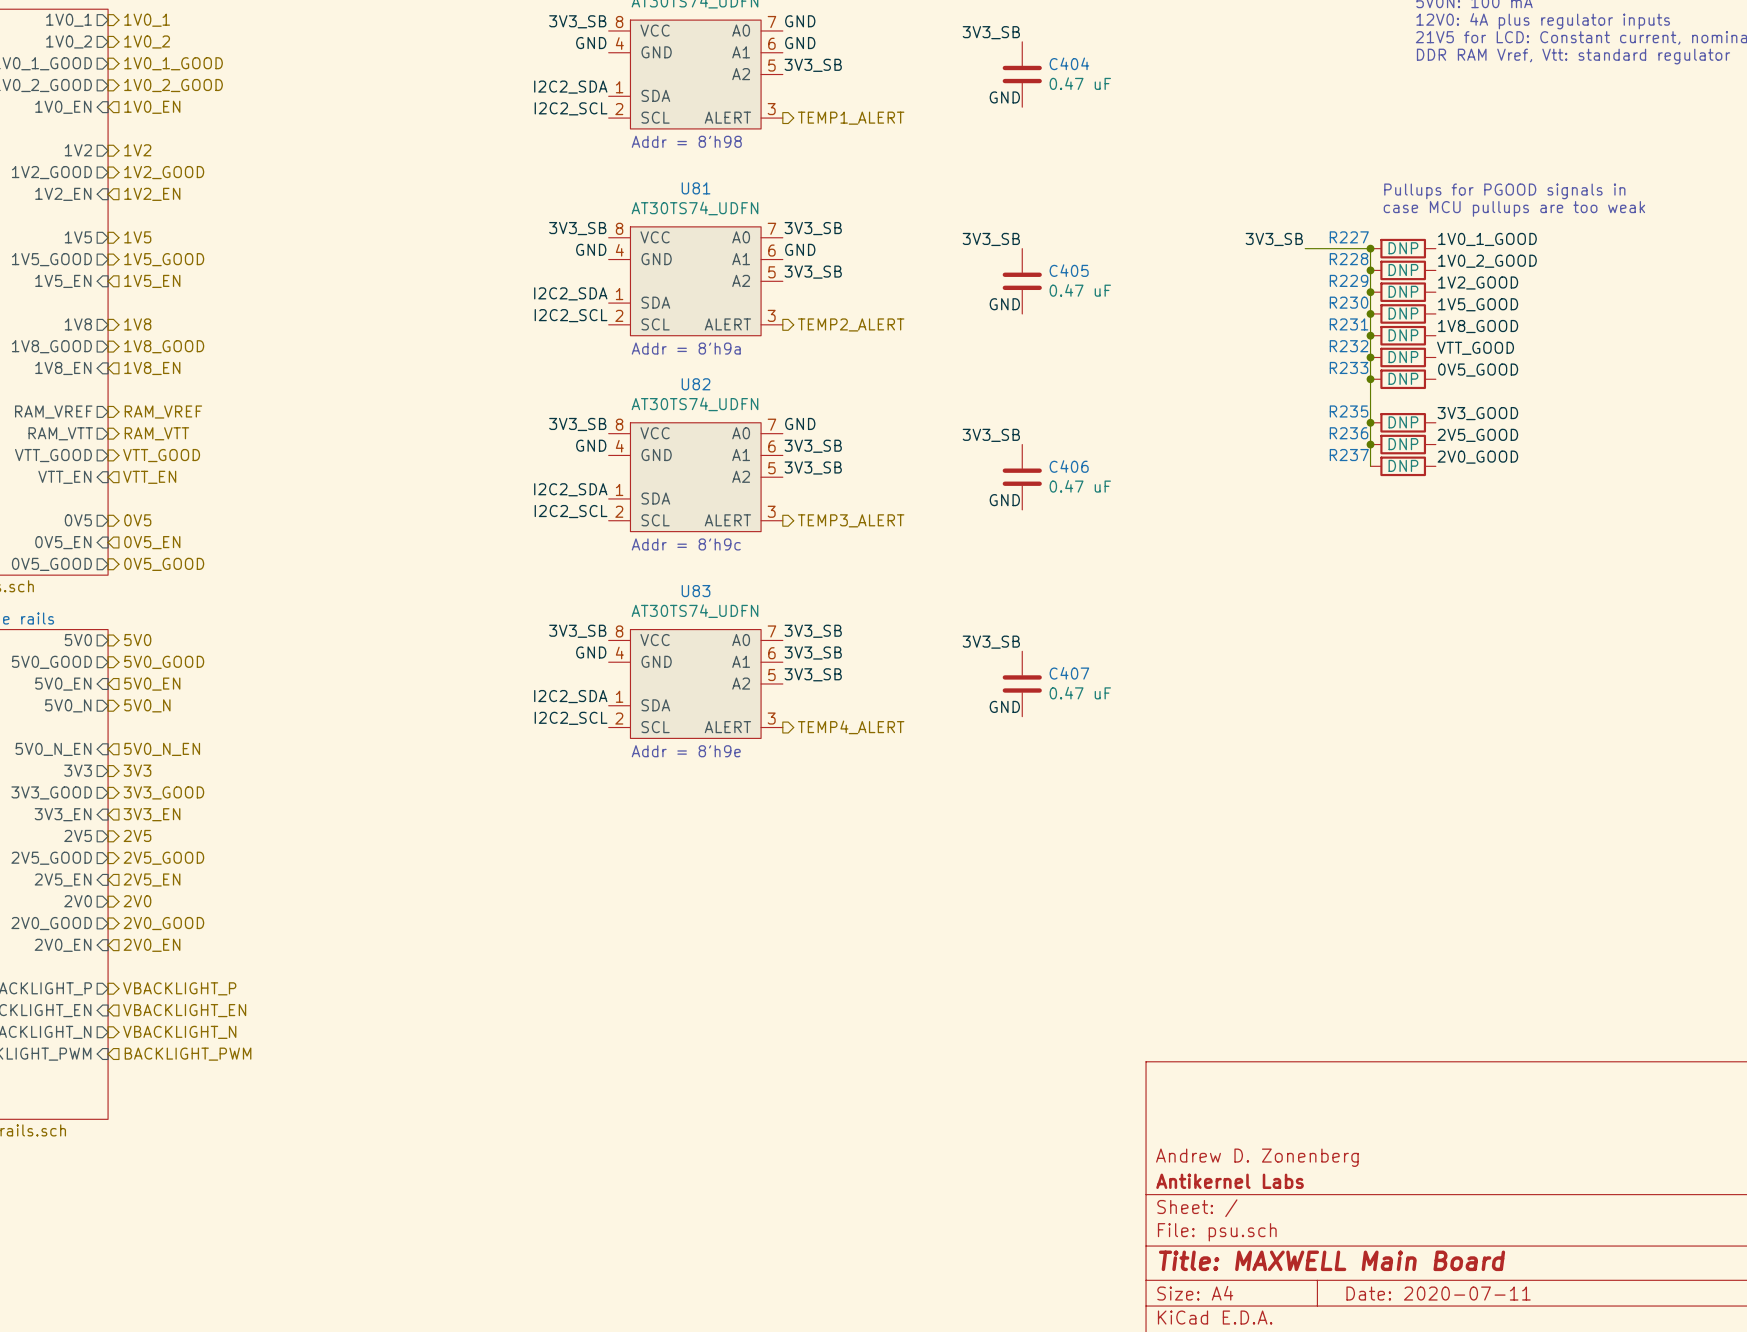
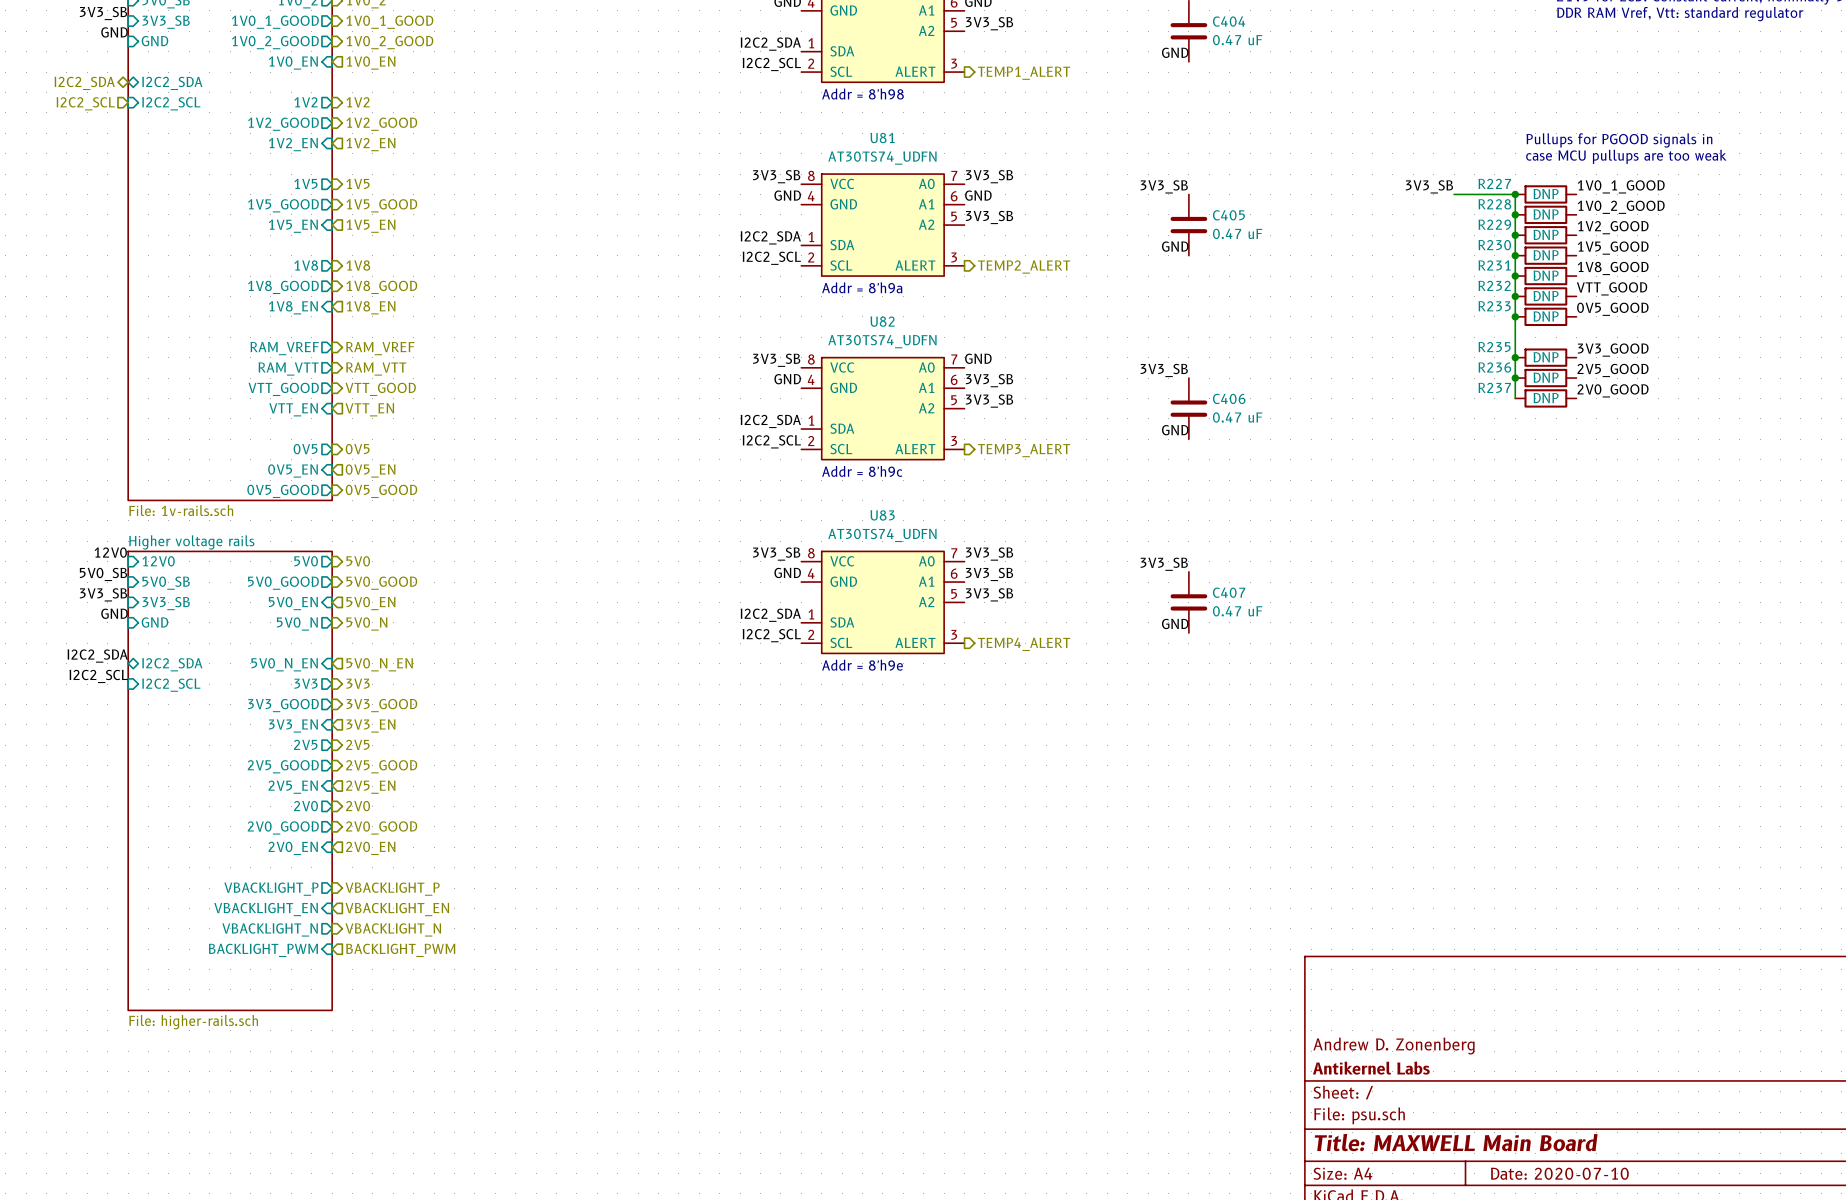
title block: Date: 2020-07-11 (1438, 1293) -> Date: 2020-07-10 (1559, 1173)

